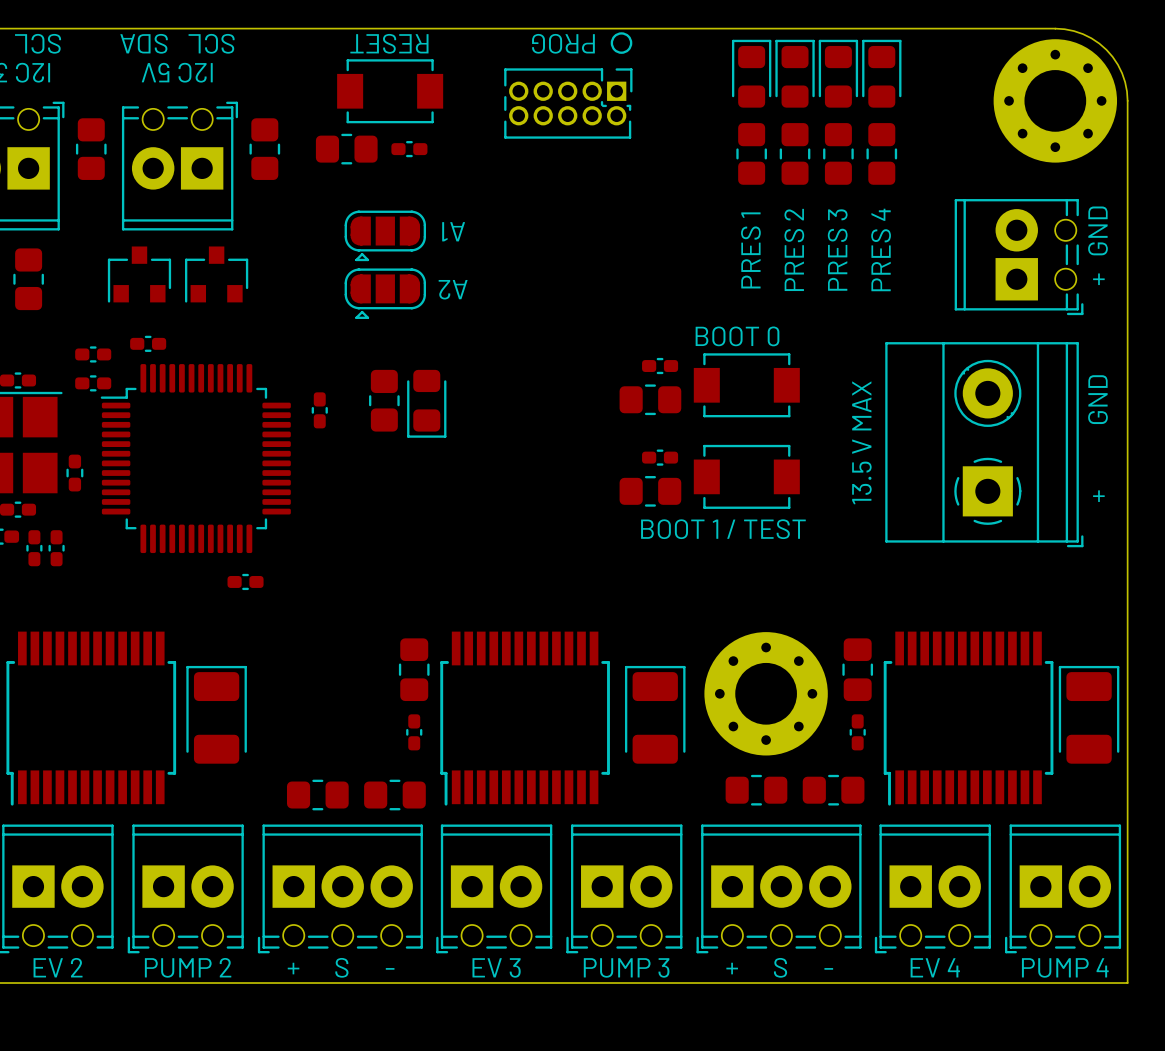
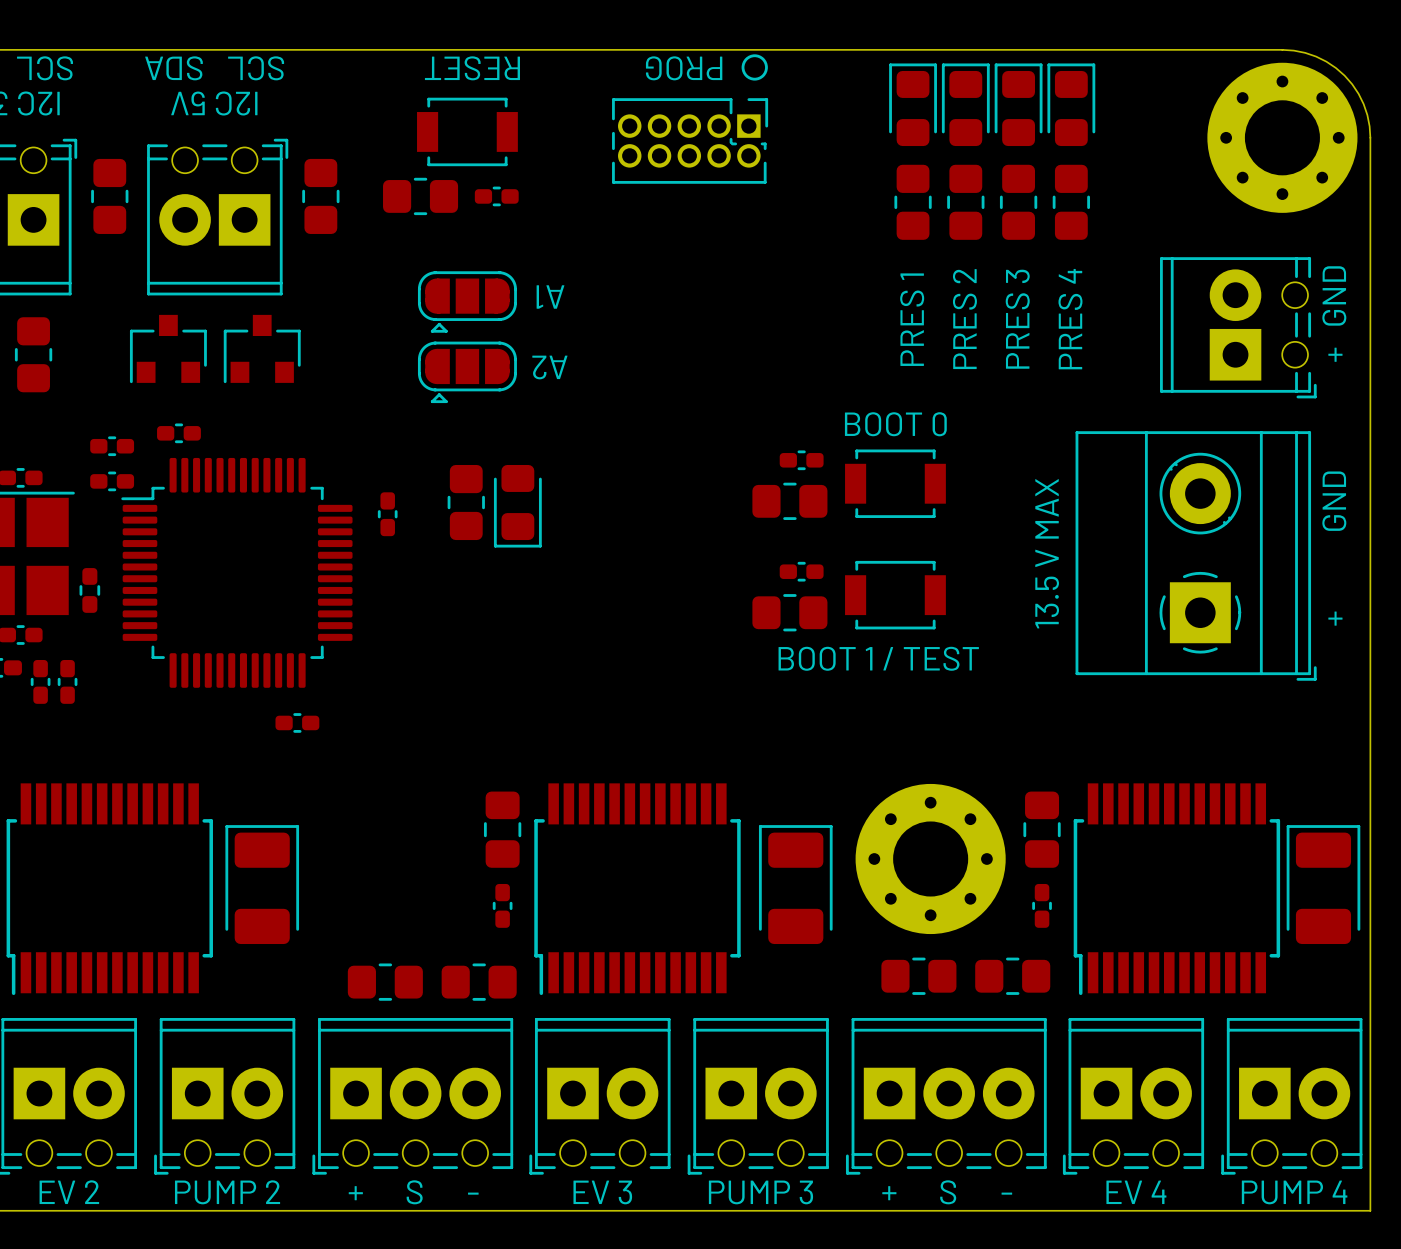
part footprint: [337, 59, 444, 124] -> [417, 97, 518, 167]
part footprint: [693, 353, 800, 418] -> [845, 449, 946, 518]
part footprint: [693, 444, 800, 509] -> [845, 560, 946, 630]

